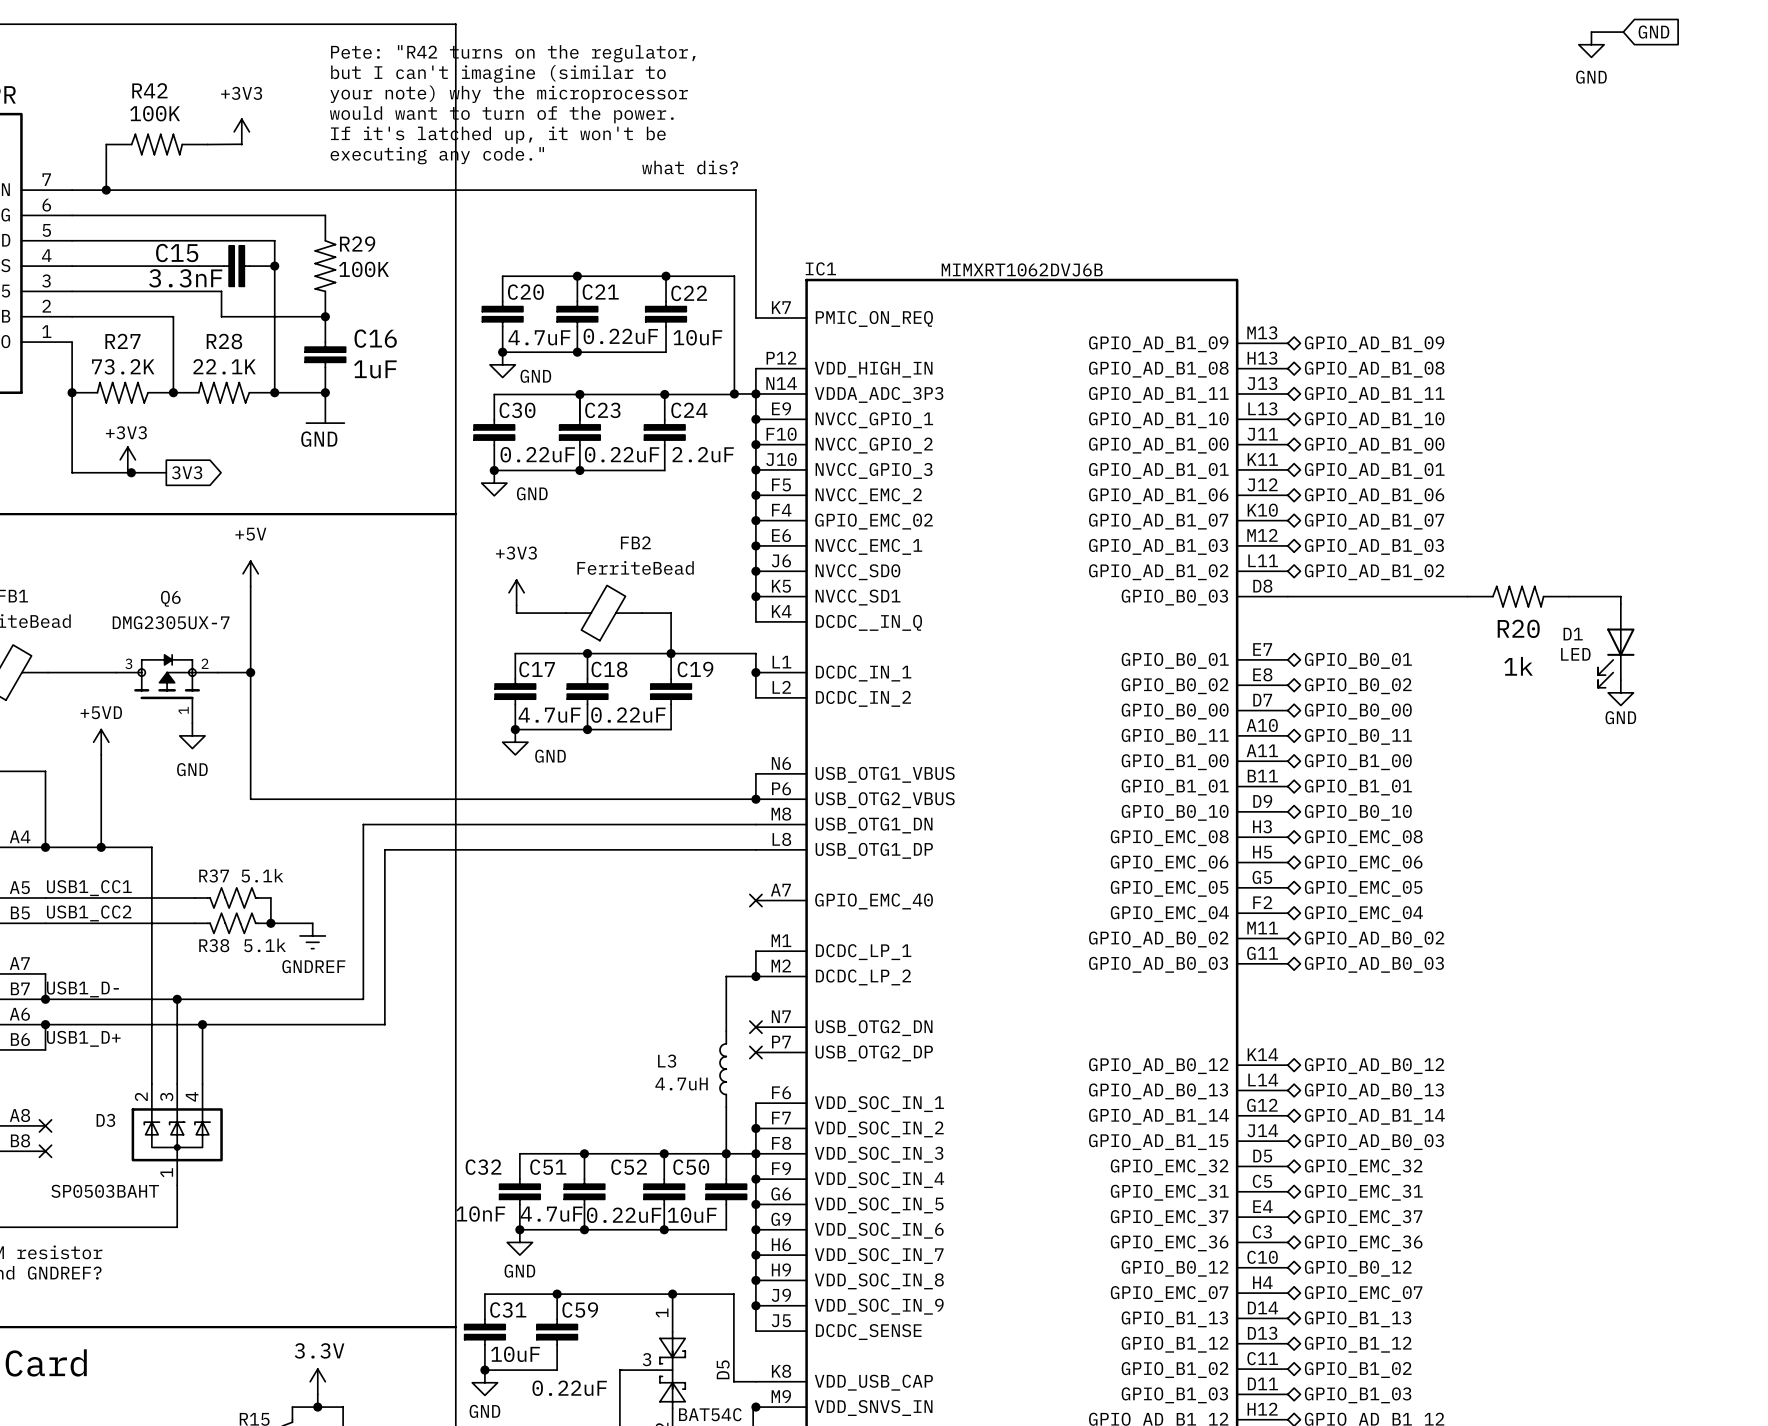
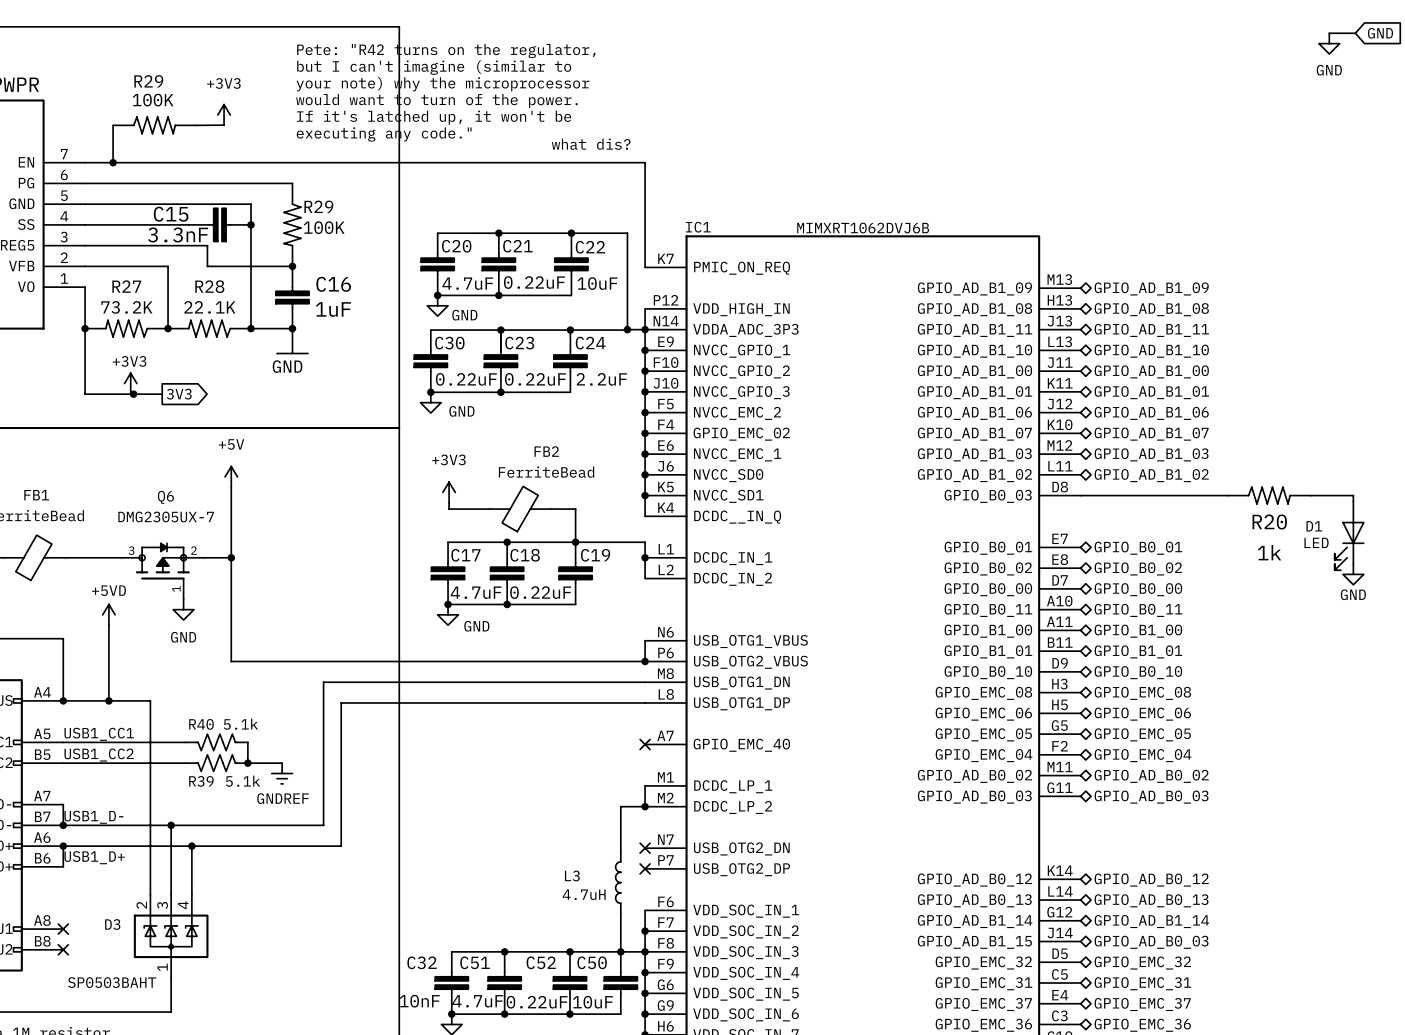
R42 name: R42 (149, 90) -> R29 (148, 81)
R37 name: R37 (214, 875) -> R40 (201, 724)
R38 name: R38 (214, 945) -> R39 (201, 781)

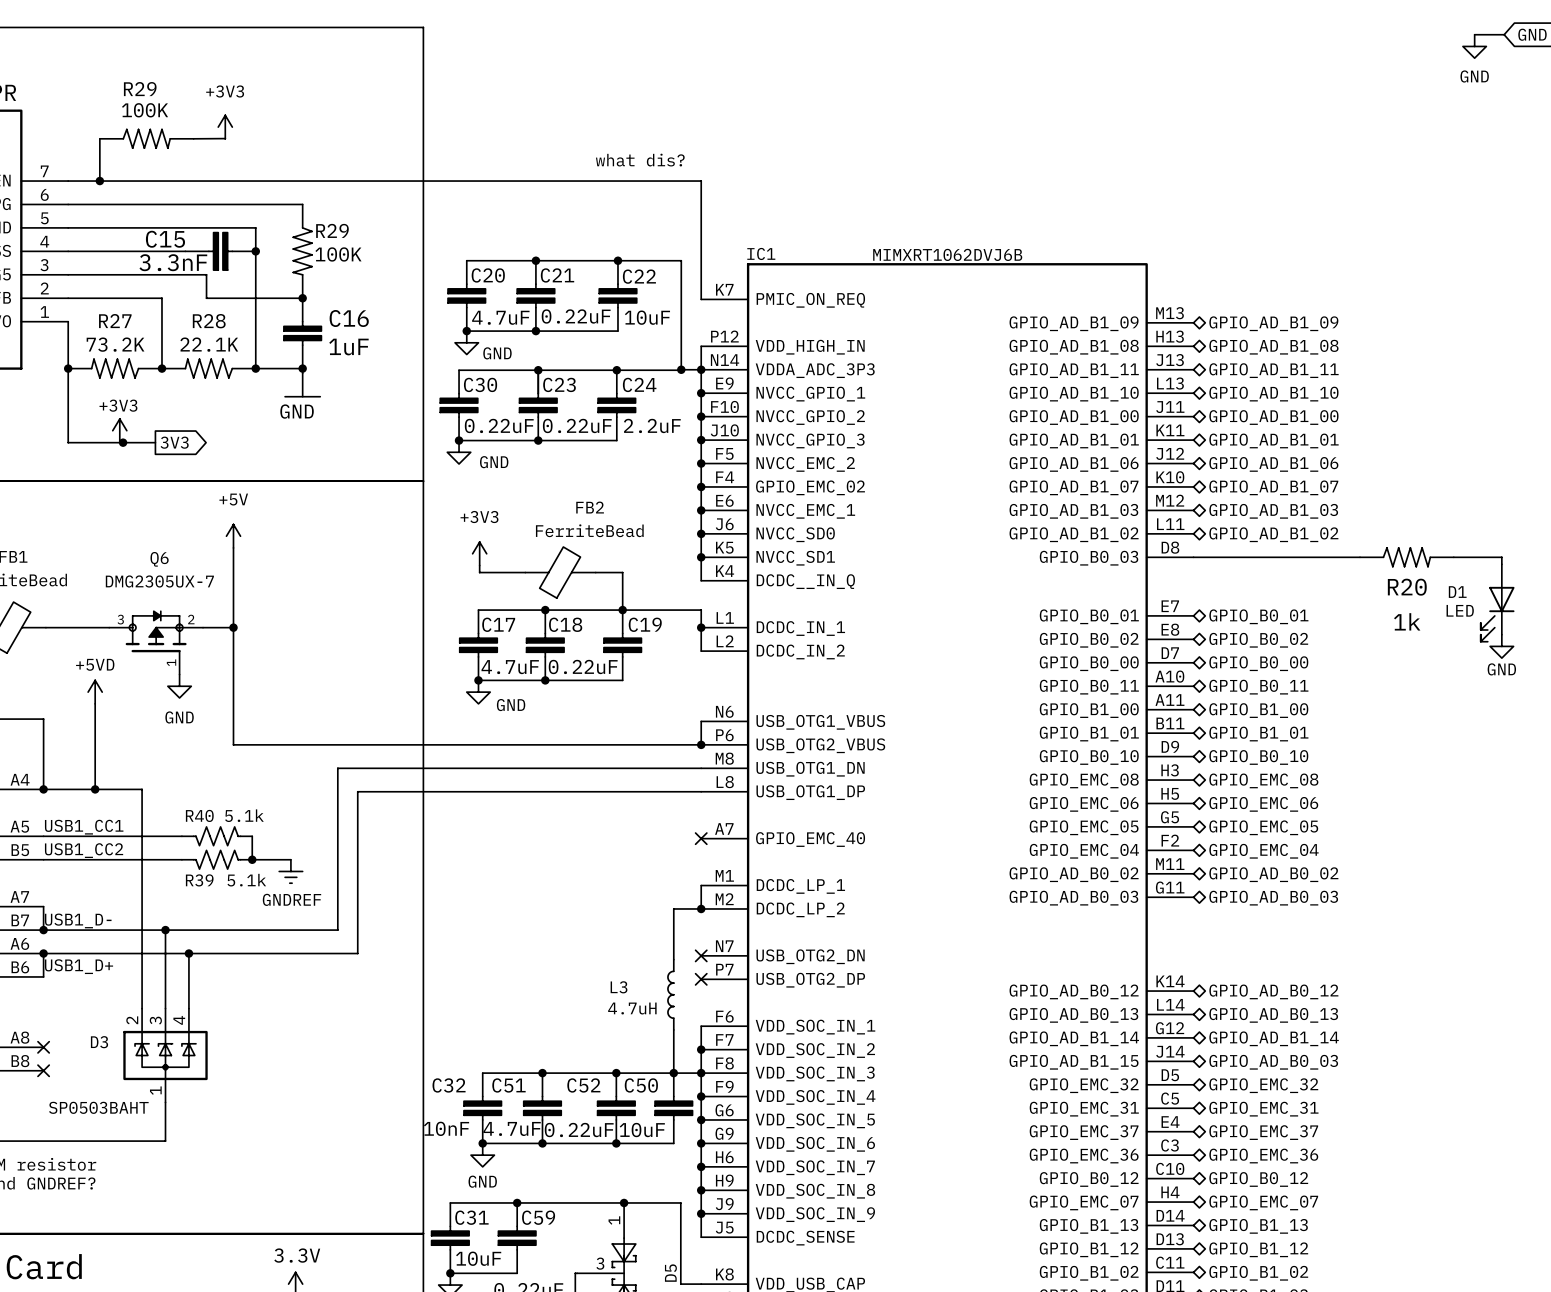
text: Pete: "R42 turns on the regulator, (446, 51) -> none
text: but I can't imagine (similar to (434, 67) -> none
text: your note) why the microprocessor (442, 84) -> none
text: would want to turn of the power. (436, 101) -> none
text: If it's latched up, it won't be (434, 117) -> none
text: executing any code." (384, 134) -> none

